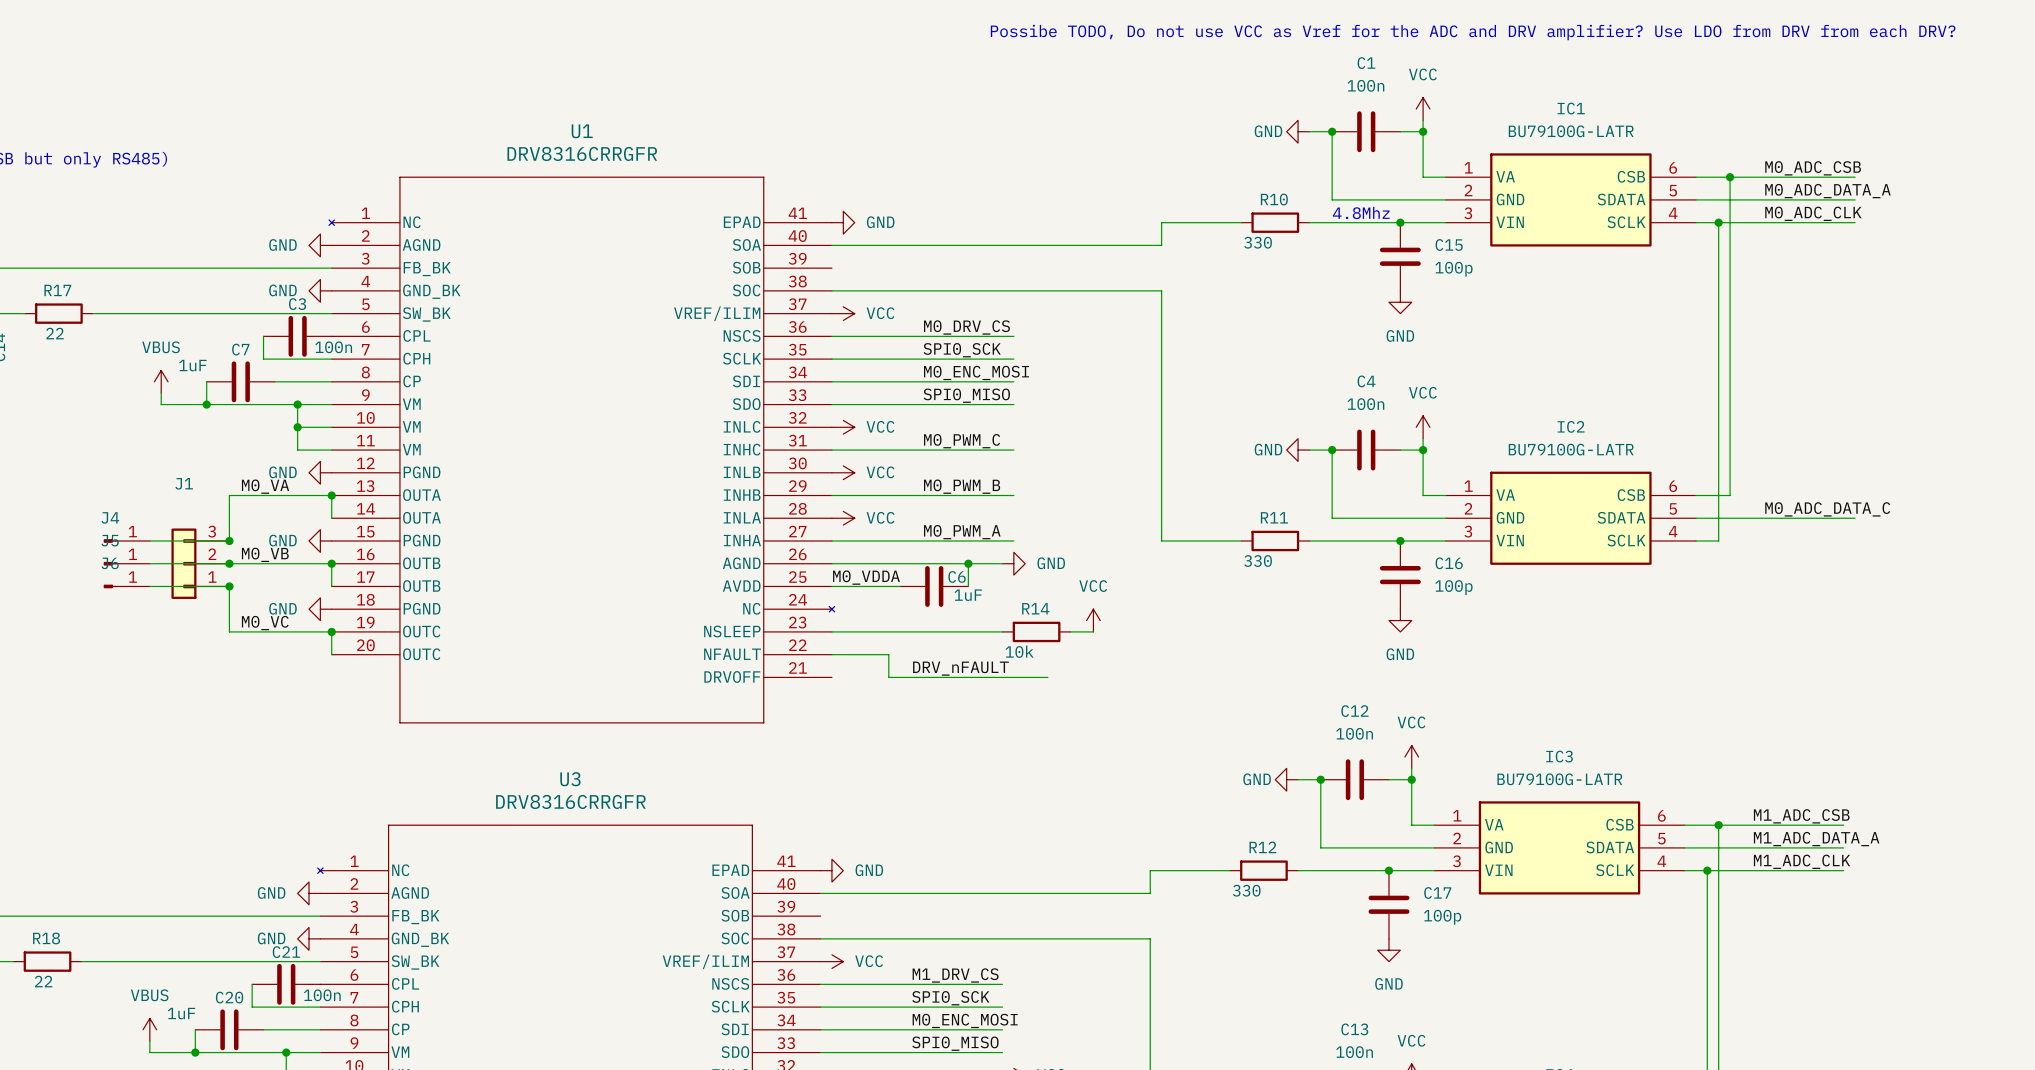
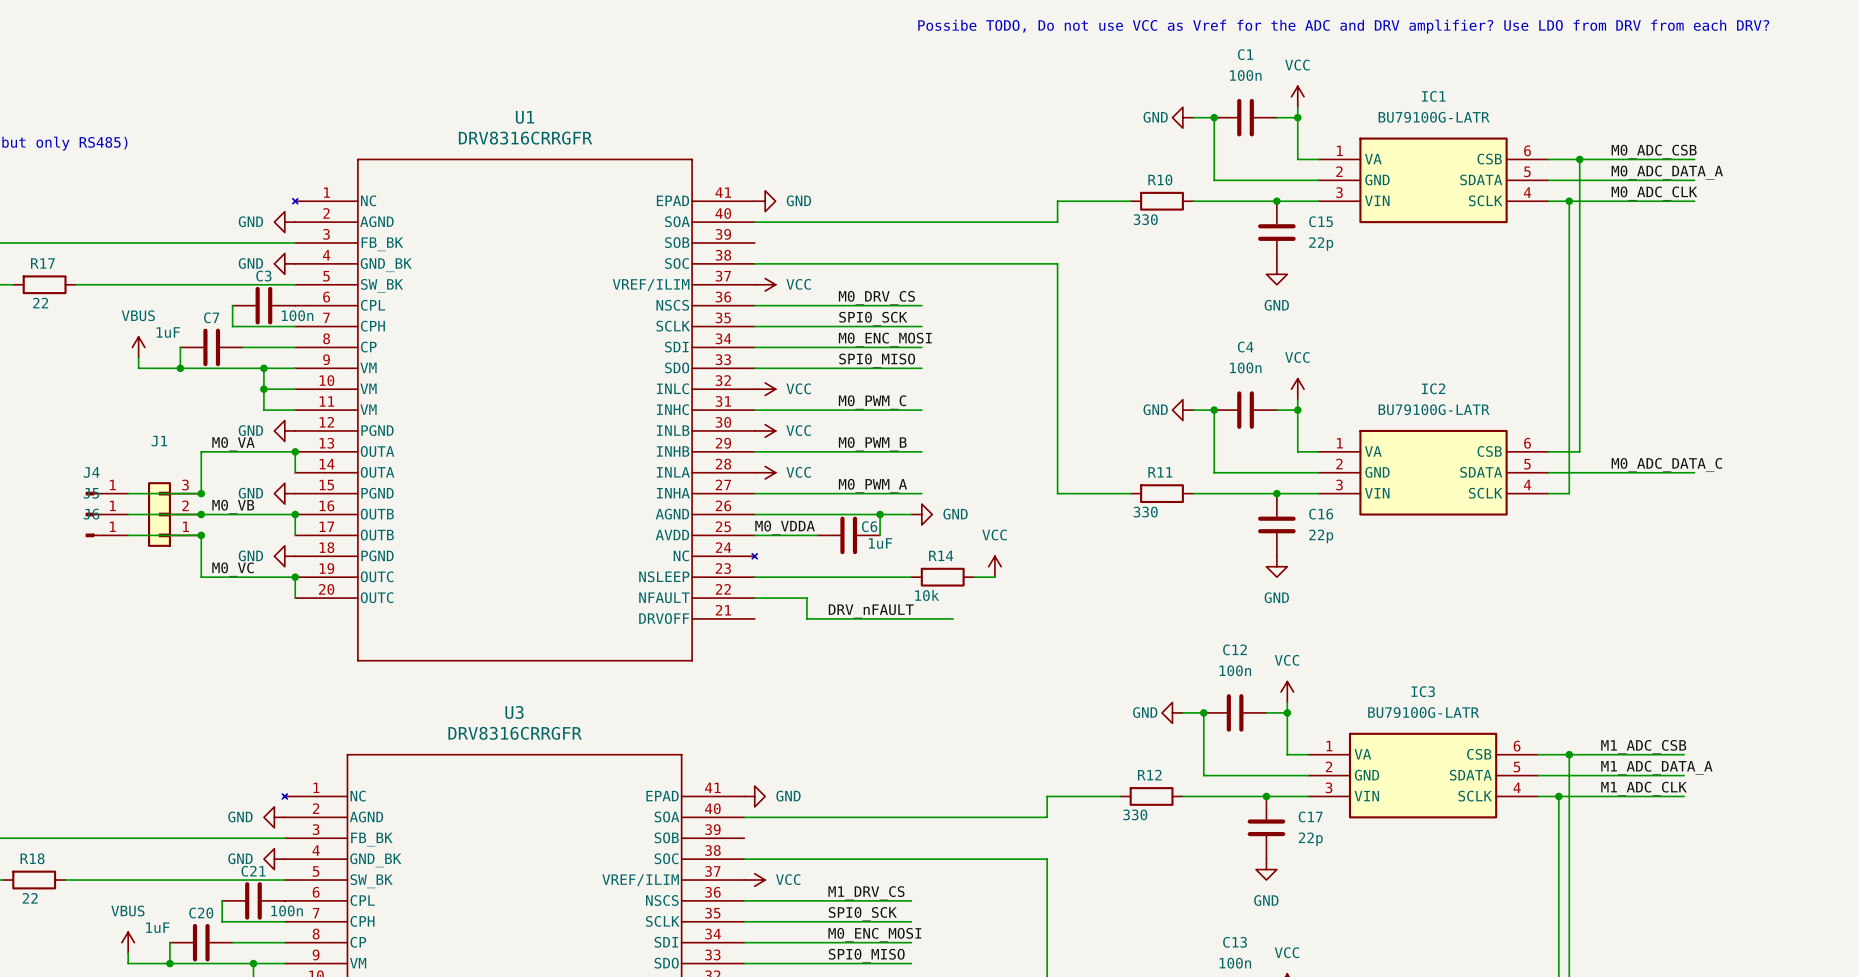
text: 4.8Mhz (1361, 212) -> none
C15 value: 100p (1453, 269) -> 22p (1321, 244)
C16 value: 100p (1453, 587) -> 22p (1321, 536)
C17 value: 100p (1442, 917) -> 22p (1310, 839)

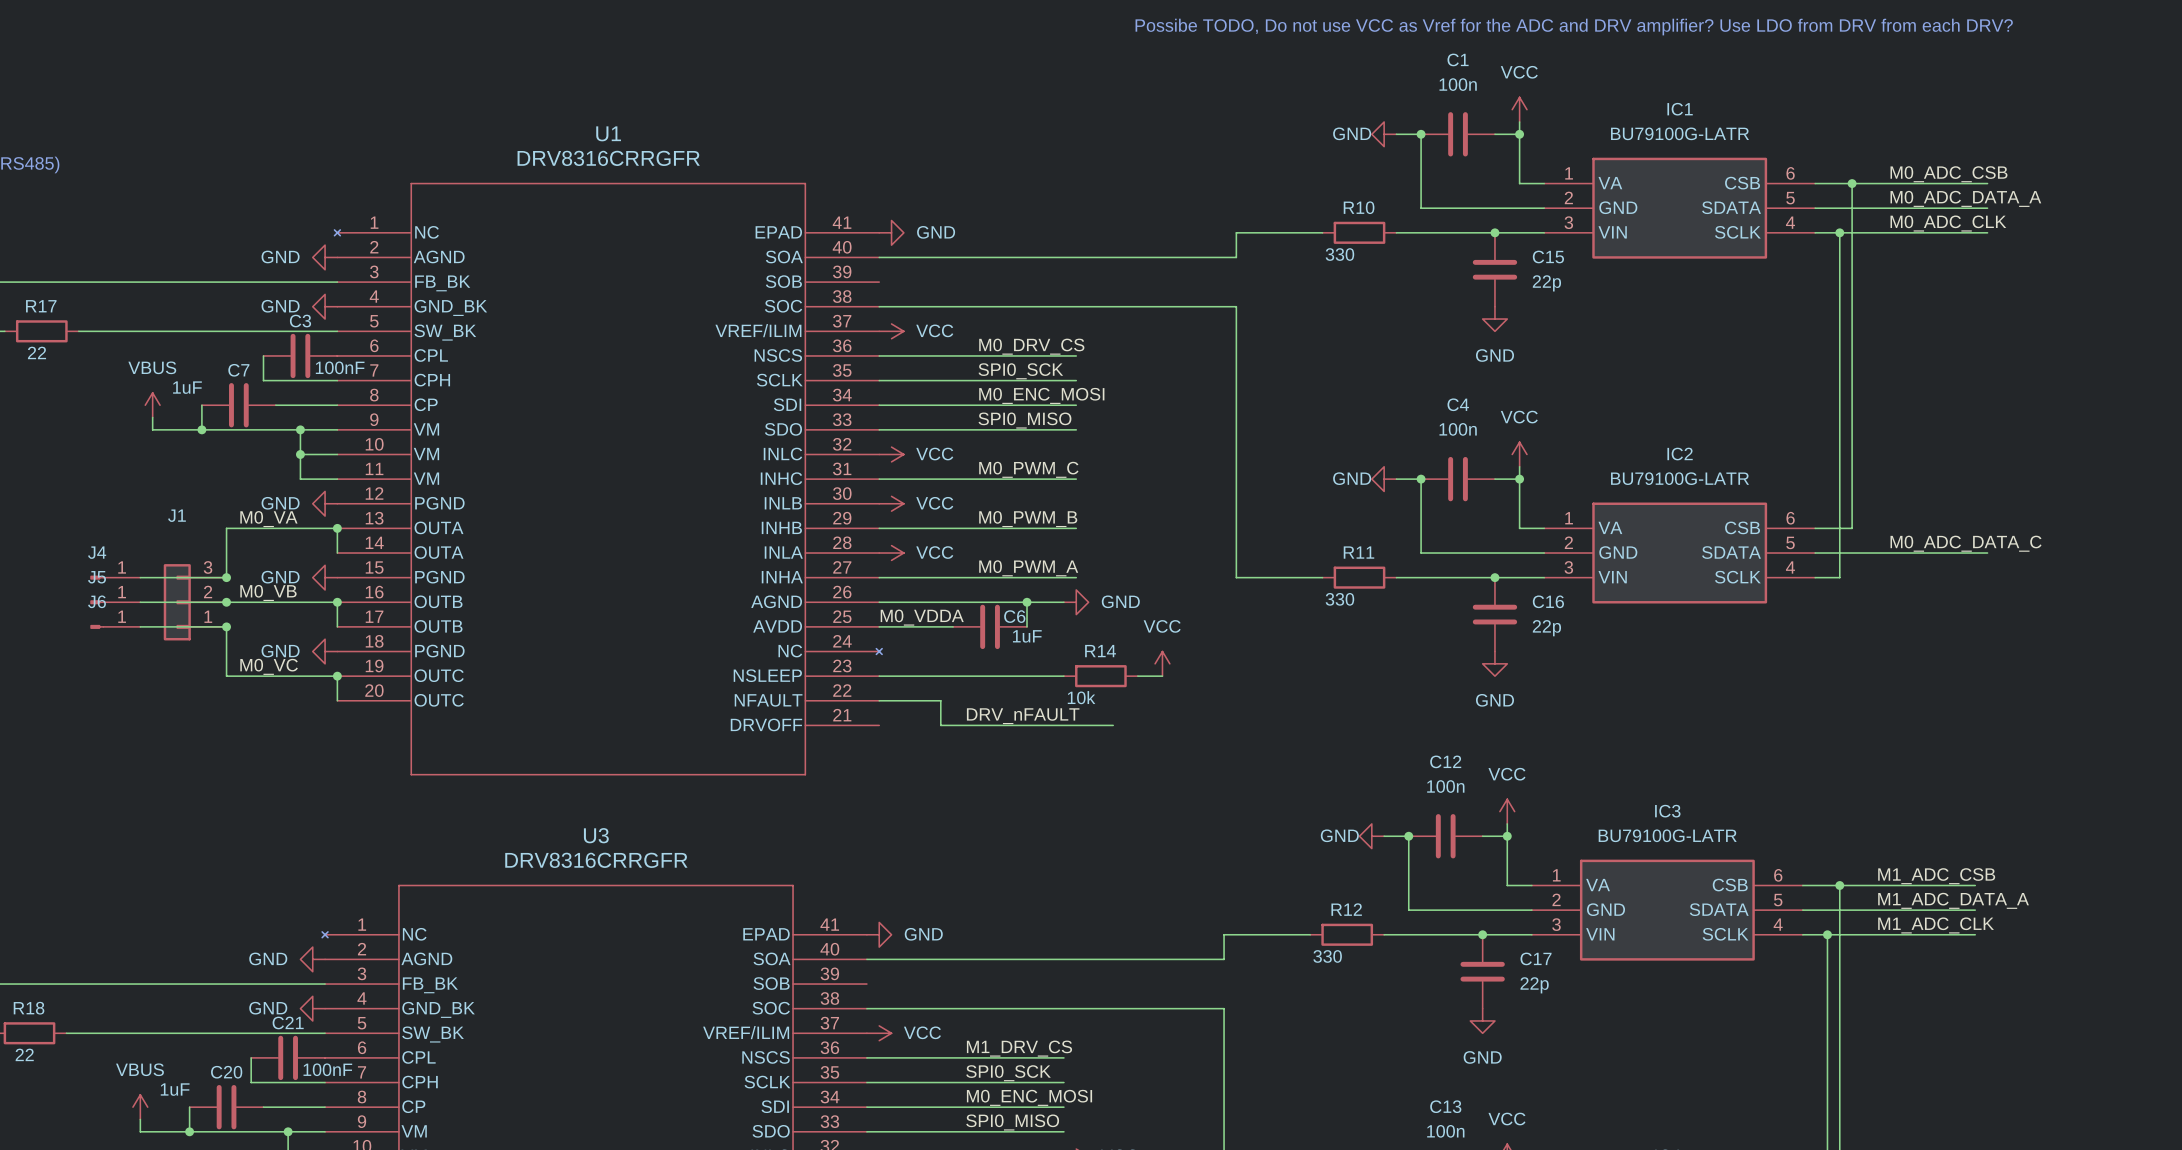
C3 value: 100n (297, 315) -> 100nF (340, 367)
C21 value: 100n (287, 910) -> 100nF (327, 1069)

